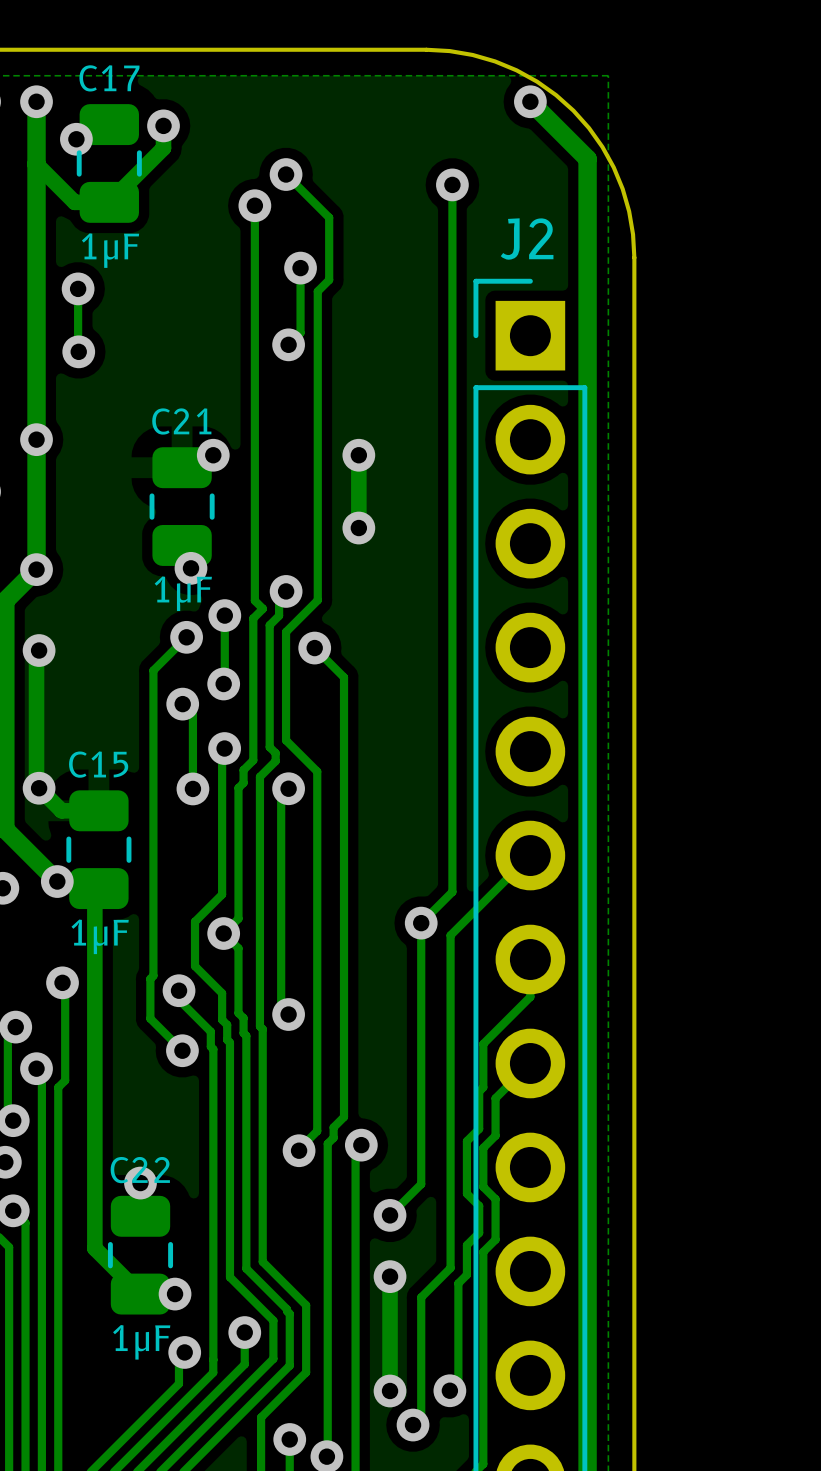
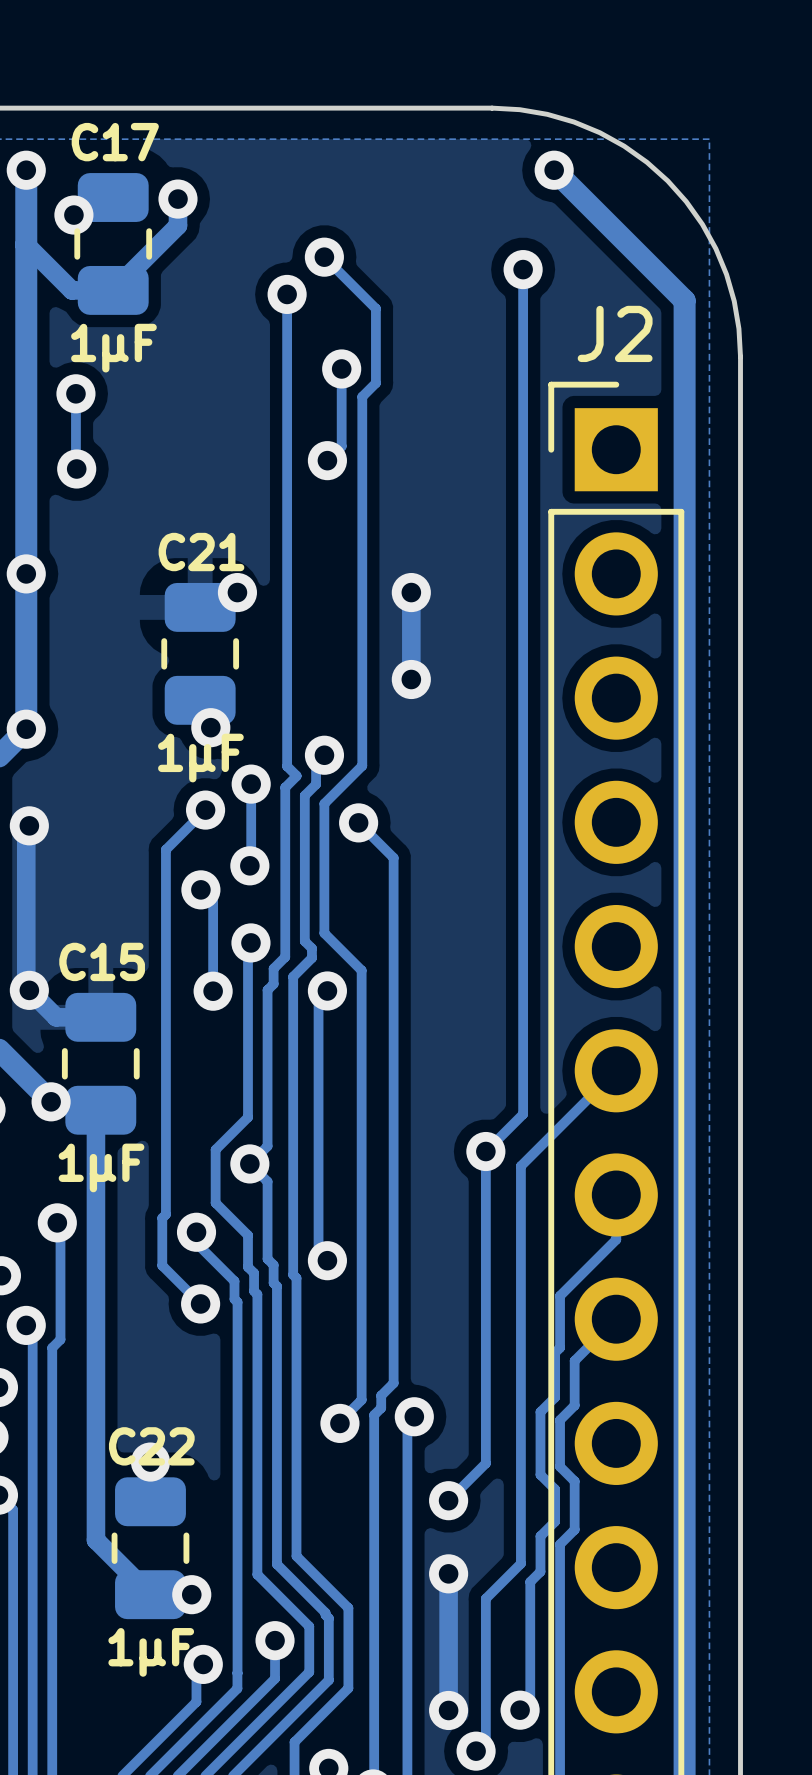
track: (530, 101) (587, 158) (587, 210) -> (554, 170) (684, 300)
via position: (530, 101) -> (554, 170)

